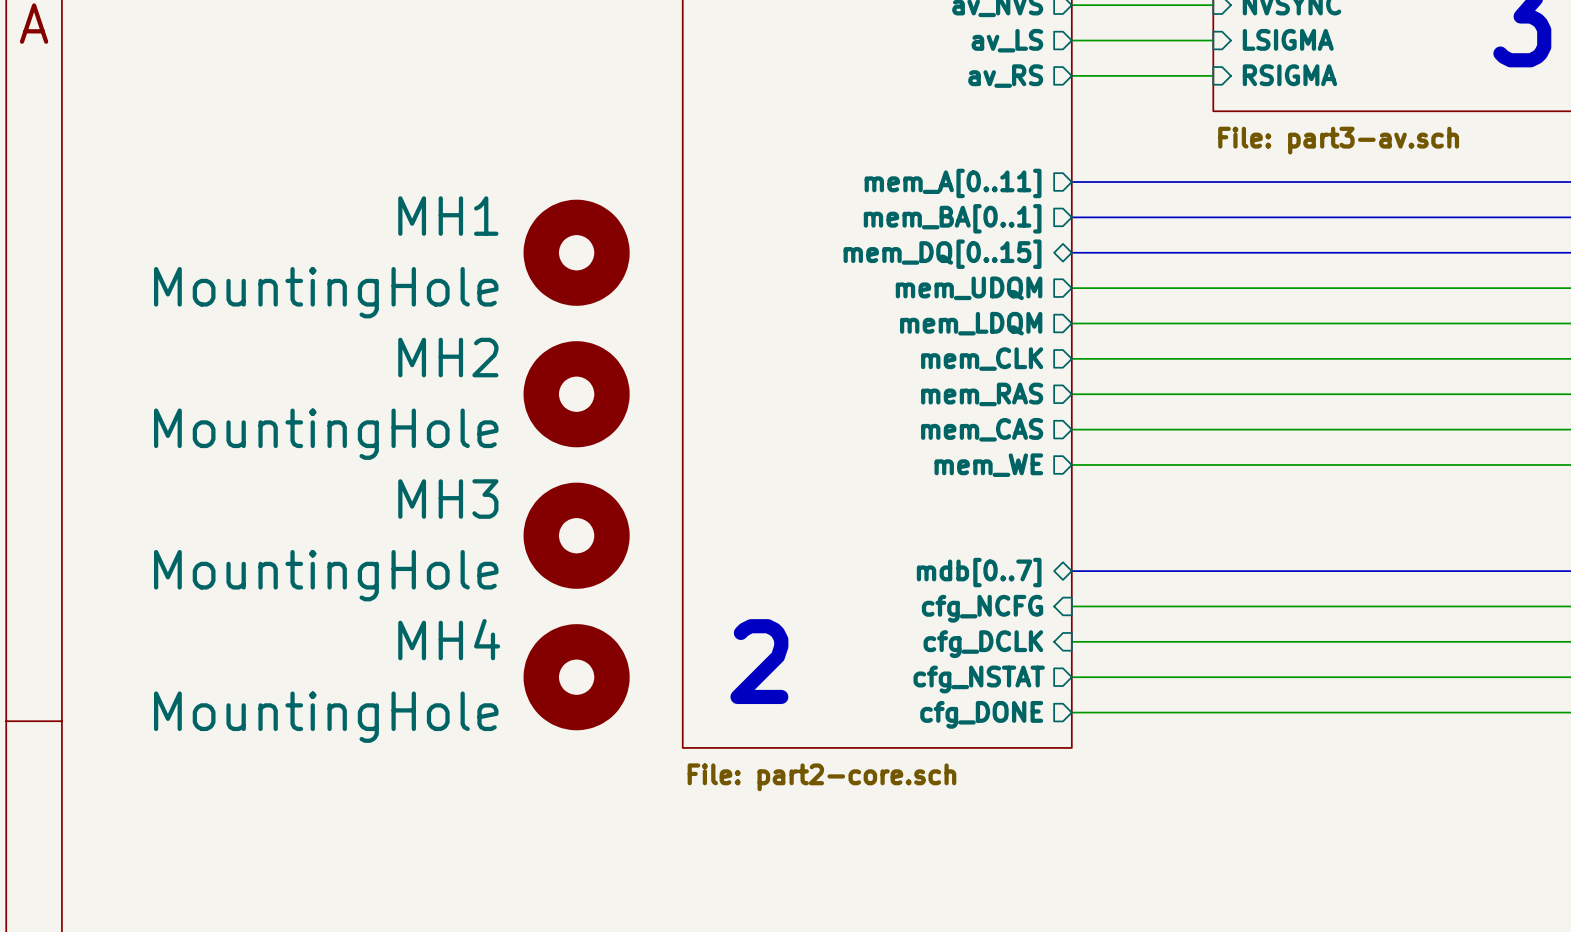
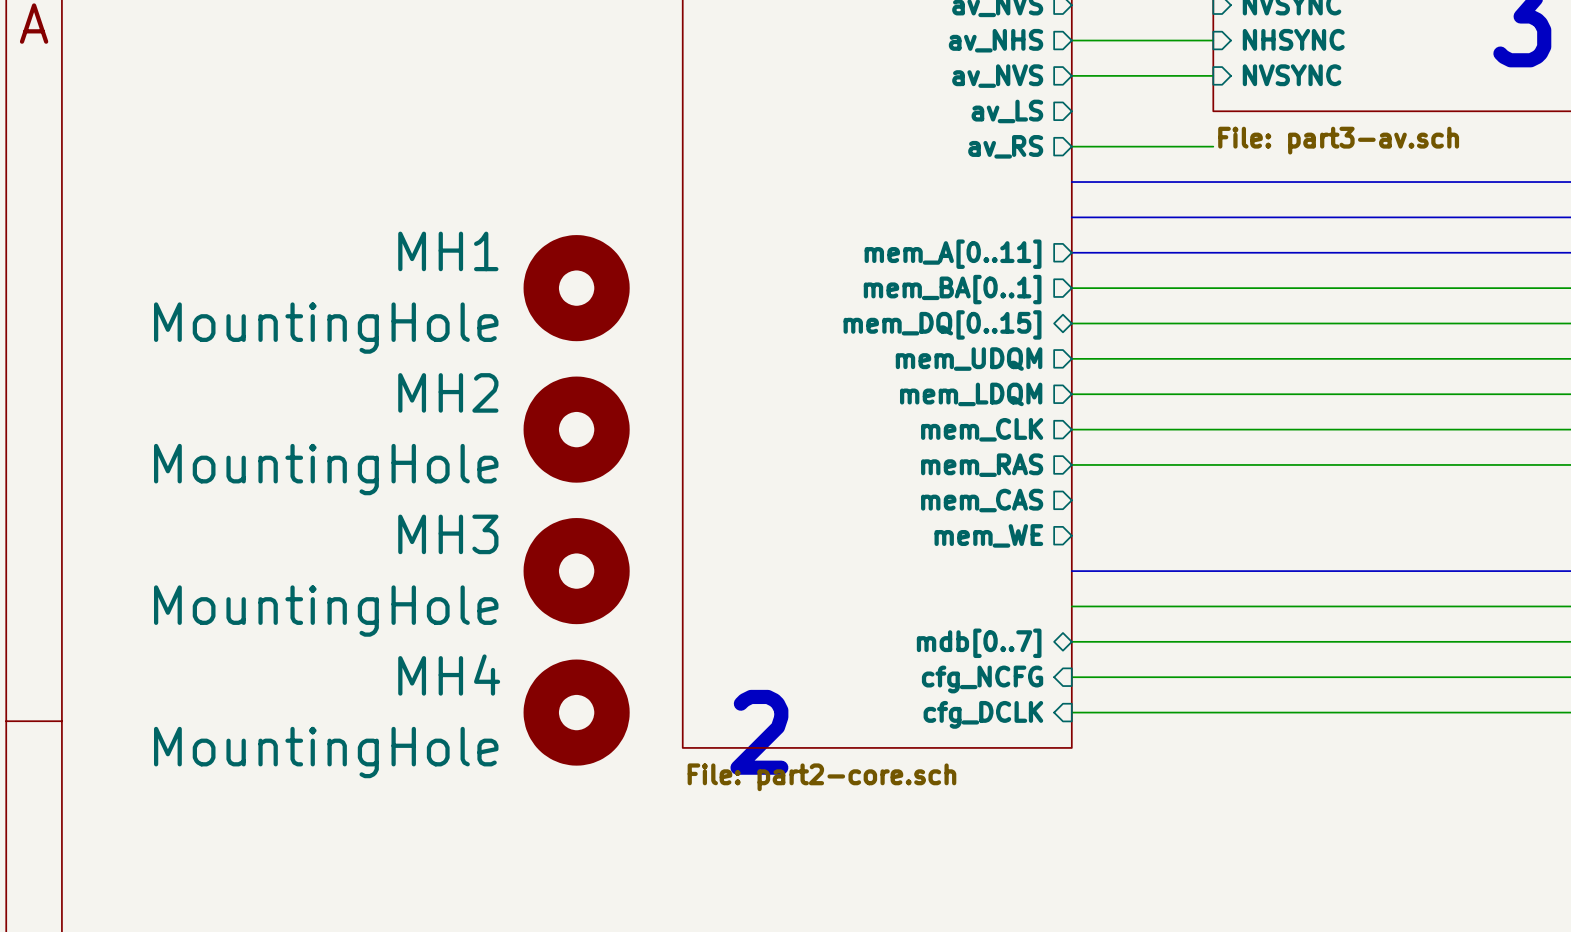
wire: (1071, 5) (1213, 5) -> (1071, 146) (1213, 146)
sheet pin: LSIGMA (1288, 39) -> NHSYNC (1293, 39)
sheet pin: av_LS (1007, 40) -> av_NHS (996, 40)
sheet pin: RSIGMA (1289, 75) -> NVSYNC (1292, 75)
sheet pin: av_RS (1005, 76) -> av_NVS (997, 76)
sheet pin: none -> av_LS (1007, 111)
sheet pin: none -> av_RS (1005, 146)
sheet pin: mem_A[0..11] (953, 183) -> none
sheet pin: mem_BA[0..1] (952, 218) -> none
MH1 position: (576, 252) -> (576, 288)
sheet pin shape: bidirectional (942, 254) -> output (953, 254)
sheet pin: mem_DQ[0..15] (942, 254) -> mem_A[0..11] (953, 254)
sheet pin: mem_UDQM (969, 288) -> mem_BA[0..1] (952, 289)
sheet pin shape: output (971, 323) -> bidirectional (942, 324)
sheet pin: mem_LDQM (971, 323) -> mem_DQ[0..15] (942, 324)
sheet pin: mem_CLK (982, 359) -> mem_UDQM (969, 359)
MH2 position: (576, 394) -> (576, 429)
sheet pin: mem_RAS (982, 394) -> mem_LDQM (971, 394)
sheet pin: mem_CAS (982, 429) -> mem_CLK (982, 429)
sheet pin: mem_WE (988, 465) -> mem_RAS (982, 465)
sheet pin: none -> mem_CAS (982, 500)
MH3 position: (576, 535) -> (576, 571)
sheet pin: none -> mem_WE (988, 535)
sheet pin: mdb[0..7] (979, 572) -> none
sheet pin: cfg_NCFG (982, 608) -> none
sheet pin shape: input (983, 644) -> bidirectional (979, 643)
sheet pin: cfg_DCLK (983, 644) -> mdb[0..7] (979, 643)
text position: 2 (759, 661) -> 2 (759, 732)
MH4 position: (576, 677) -> (576, 712)
sheet pin shape: output (979, 679) -> input (982, 679)
sheet pin: cfg_NSTAT (979, 679) -> cfg_NCFG (982, 679)
sheet pin shape: output (981, 714) -> input (983, 714)
sheet pin: cfg_DONE (981, 714) -> cfg_DCLK (983, 714)

